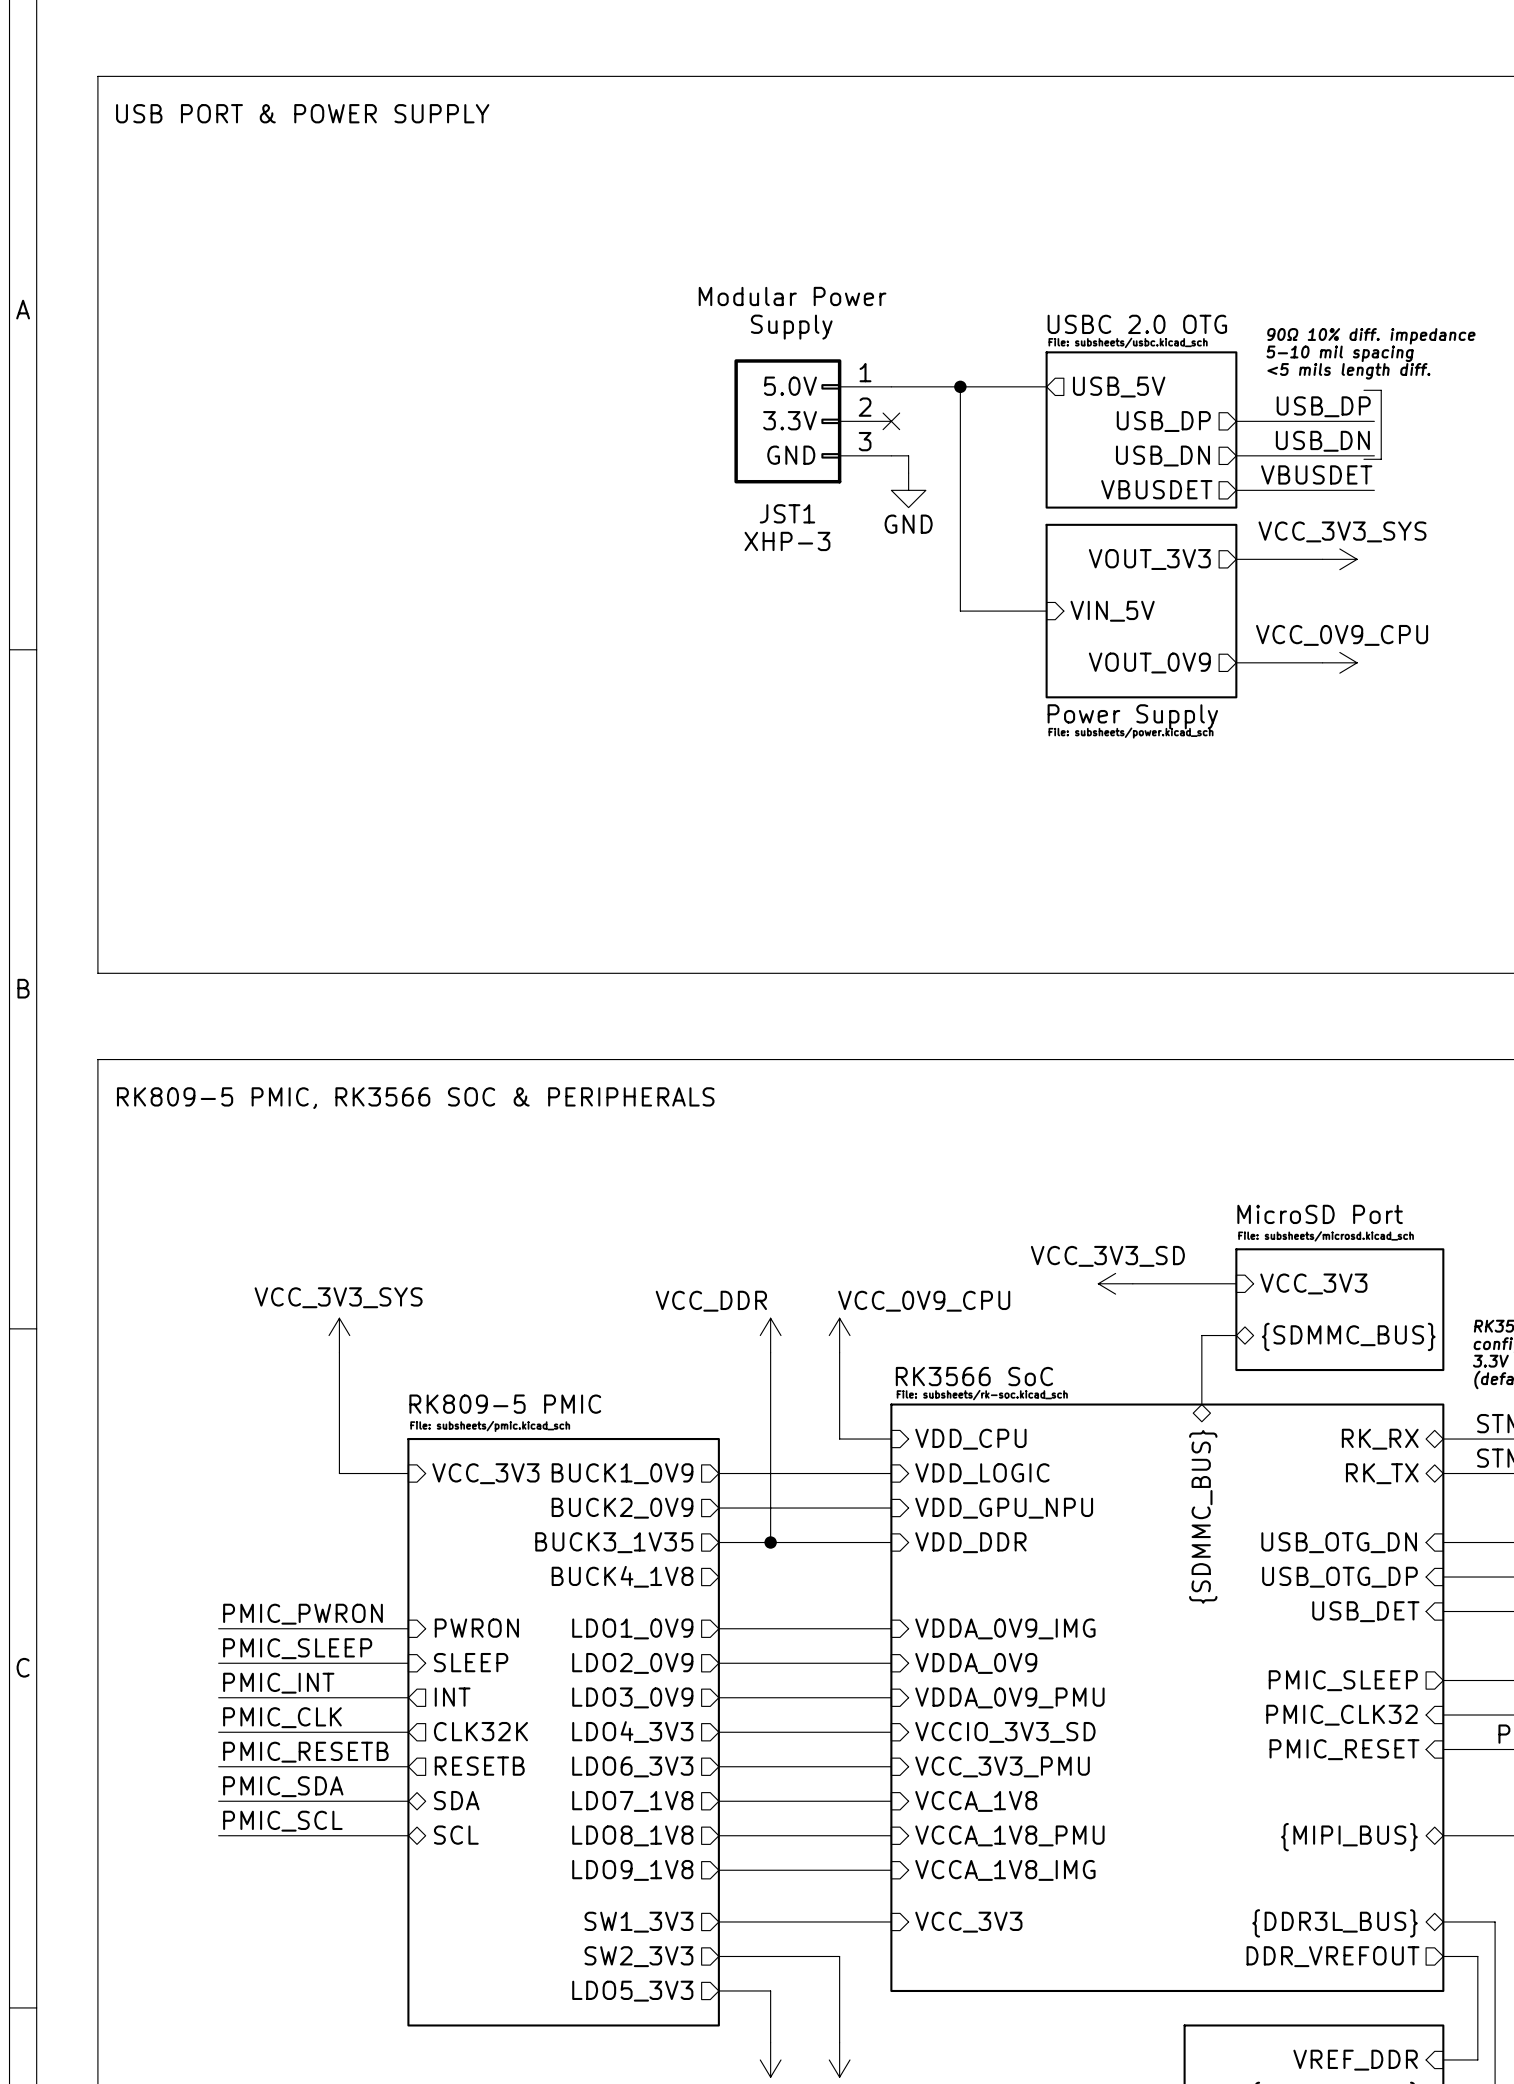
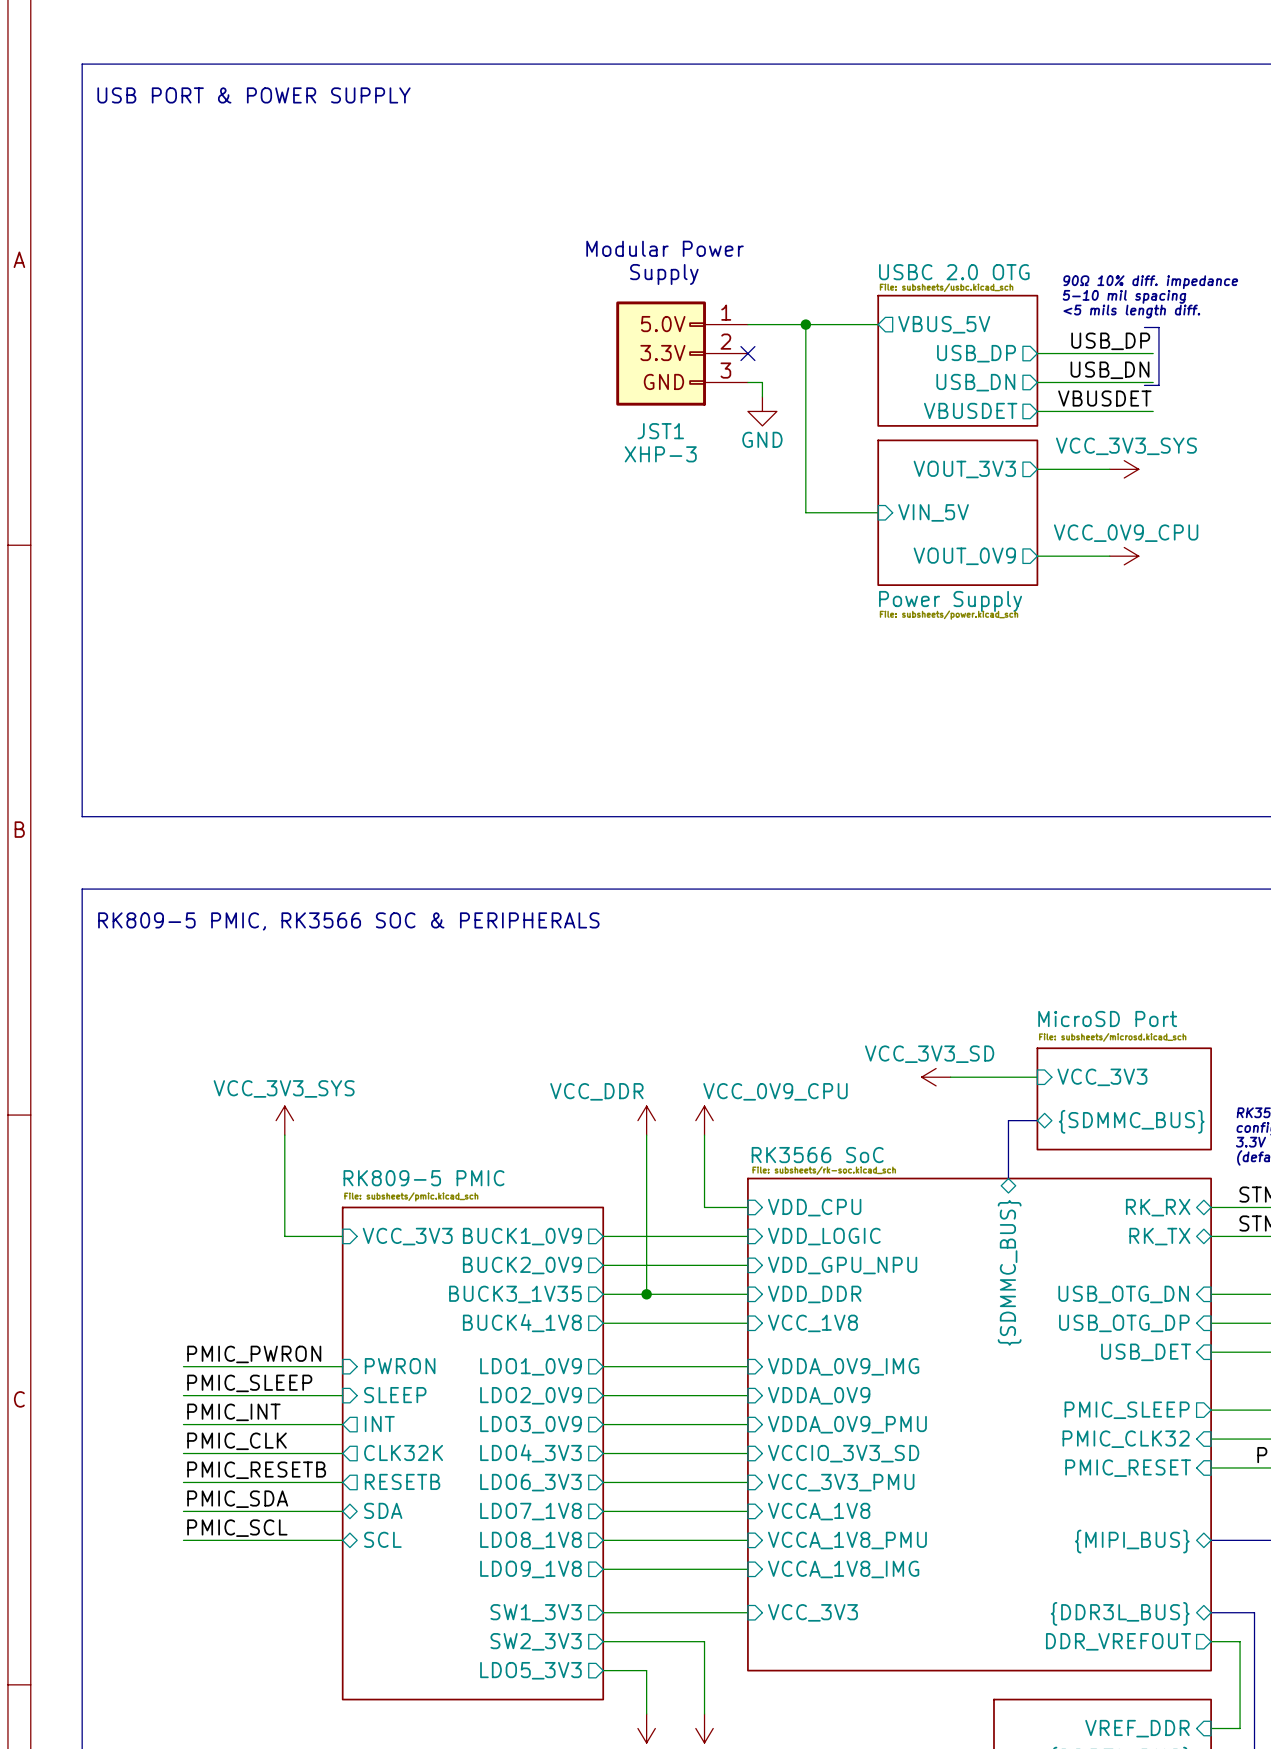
sheet pin: USB_5V (1119, 387) -> VBUS_5V (944, 324)
wire: none -> (603, 1323) (747, 1323)
sheet pin: none -> VCC_1V8 (812, 1323)

